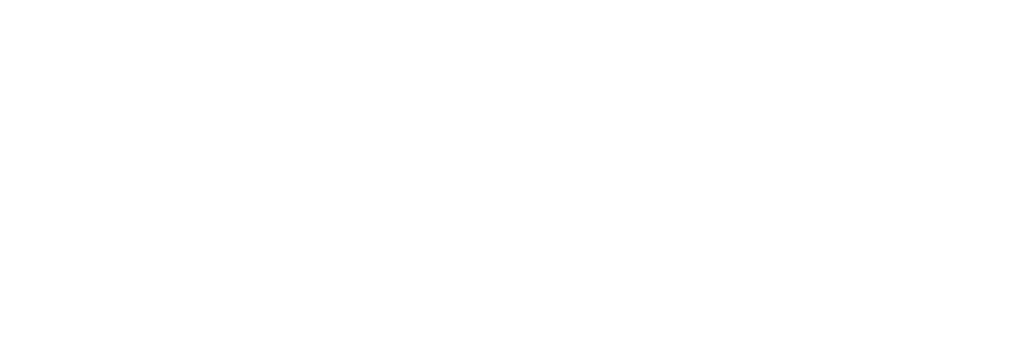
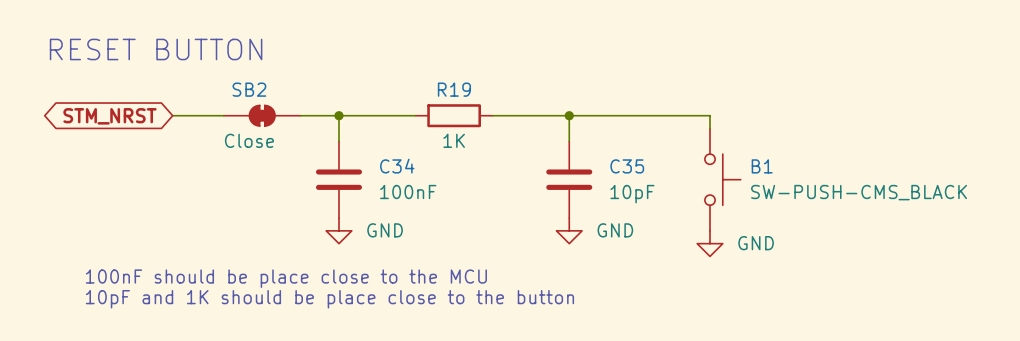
text: none -> RESET BUTTON (156, 49)
wire: none -> (172, 115) (223, 115)
SB2: none -> Close (262, 115)
wire: none -> (300, 115) (415, 115)
wire: none -> (338, 115) (338, 141)
junction: none -> (338, 115)
R19: none -> 1K (454, 115)
wire: none -> (492, 115) (710, 115) (710, 128)
wire: none -> (569, 115) (569, 141)
junction: none -> (569, 115)
global label: none -> STM_NRST (109, 116)
C34: none -> 100nF (338, 179)
C35: none -> 10pF (569, 179)
B1: none -> SW-PUSH-CMS_BLACK (722, 179)
power symbol: none -> GND (338, 230)
power symbol: none -> GND (569, 230)
power symbol: none -> GND (710, 243)
text: none -> 100nF should be place close to the MCU (286, 278)
text: none -> 10pF and 1K should be place close to the button (329, 299)

